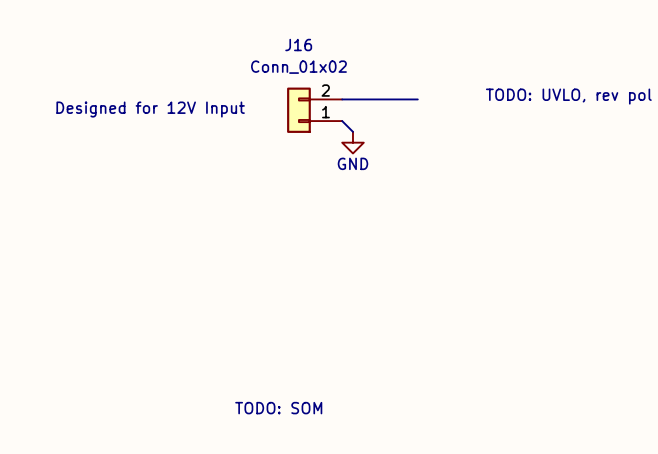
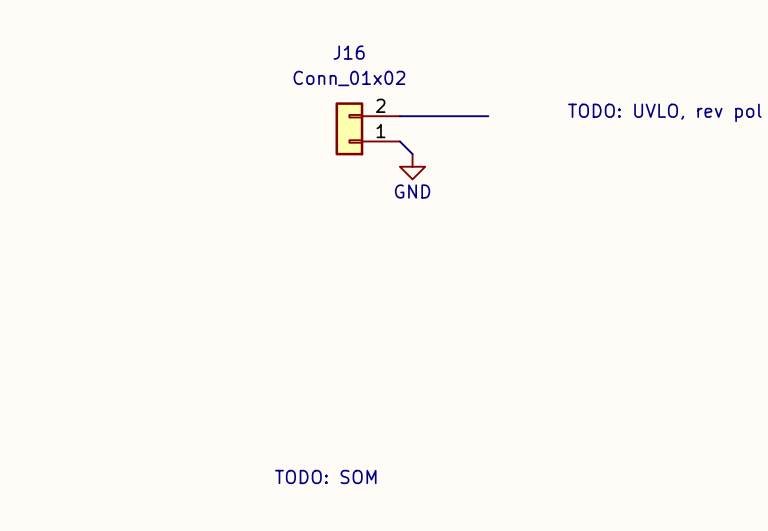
text: Designed for 12V Input (150, 109) -> none

